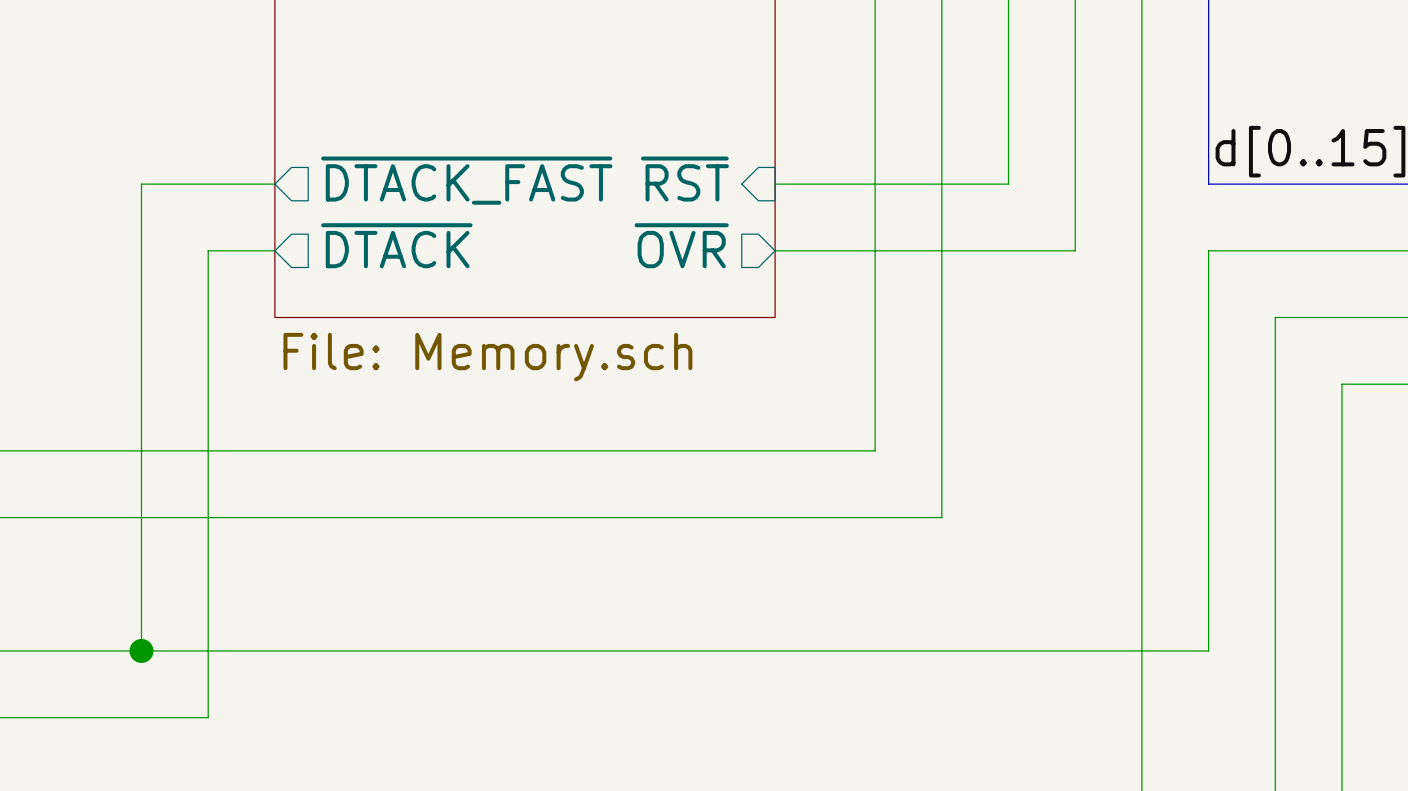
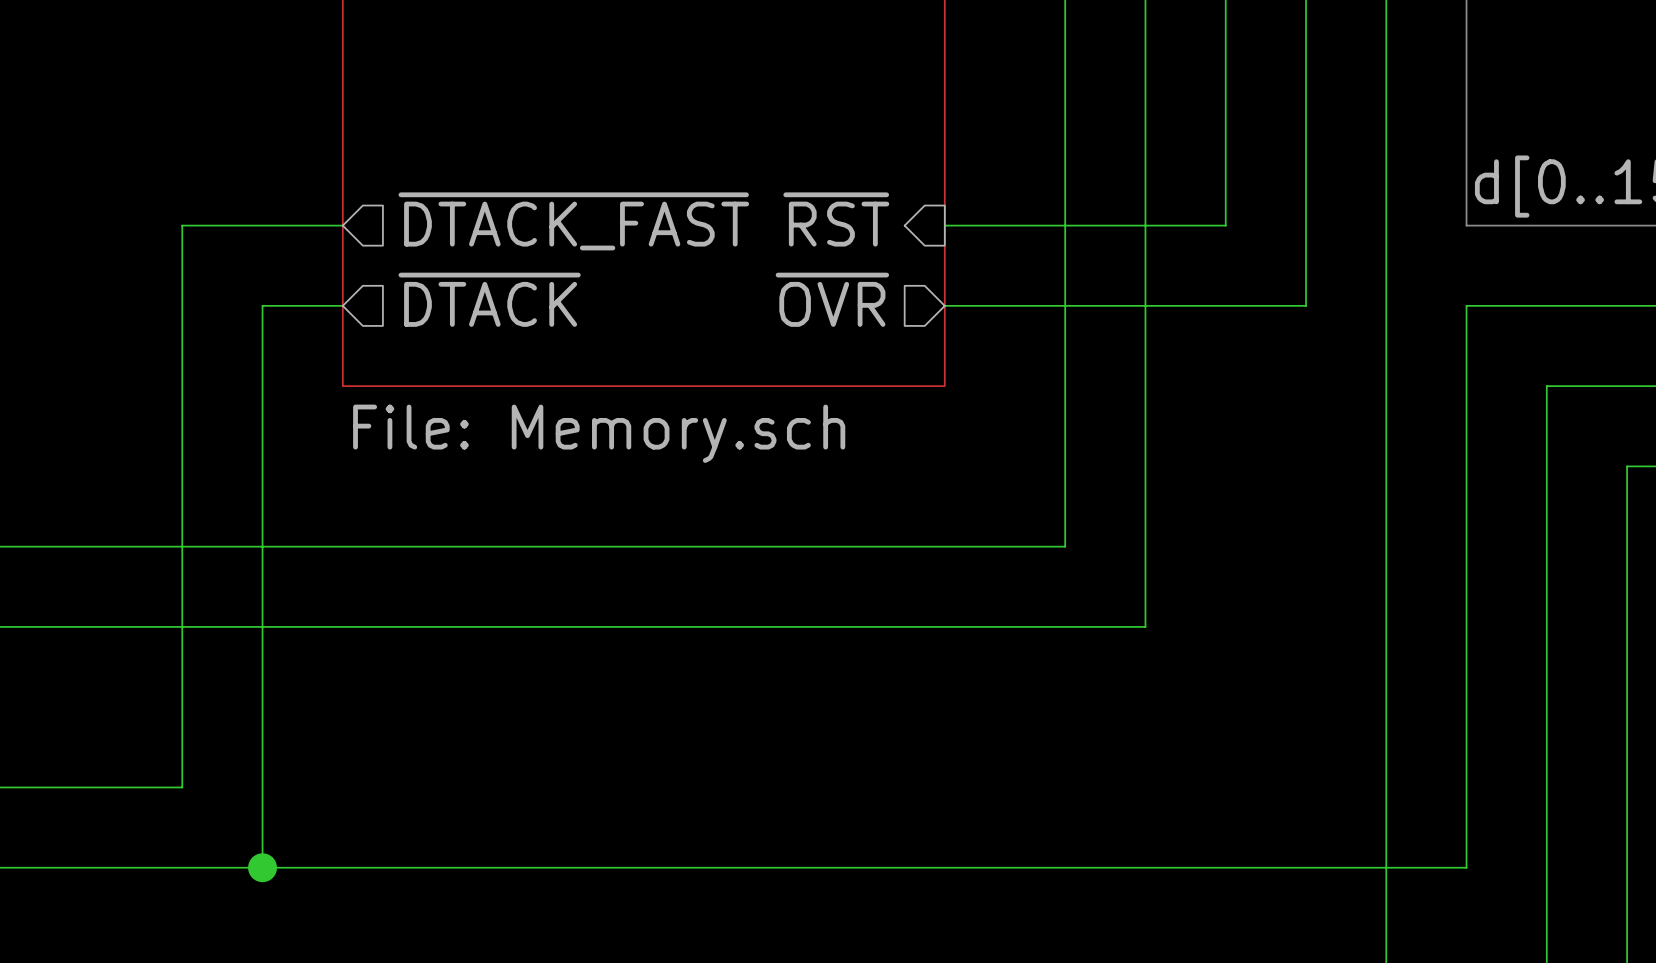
wire: (141, 650) (1208, 650) -> (262, 867) (1466, 867) (1466, 787)
junction position: (141, 650) -> (262, 867)

